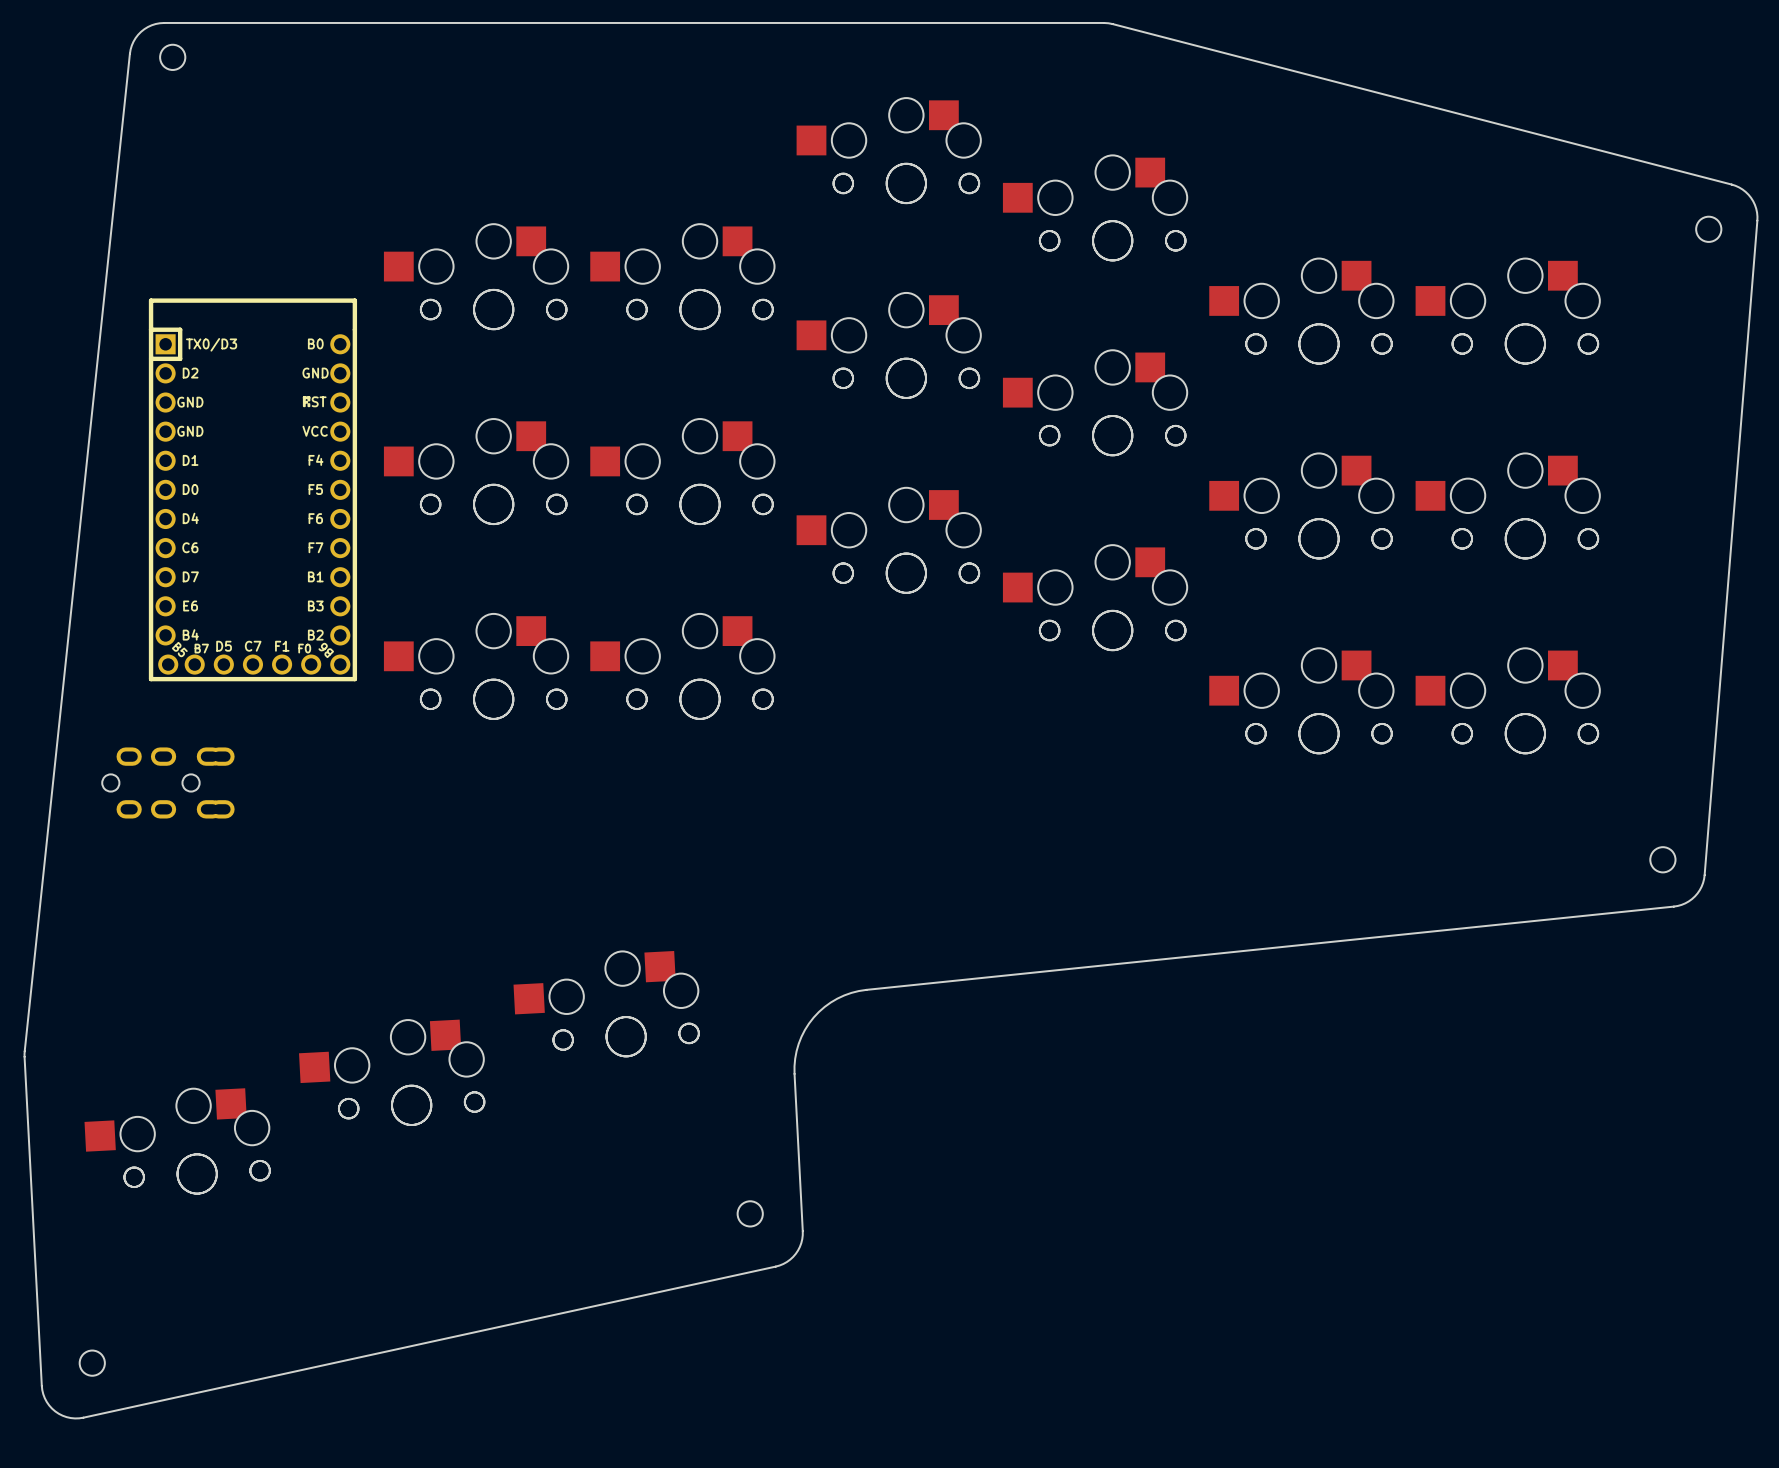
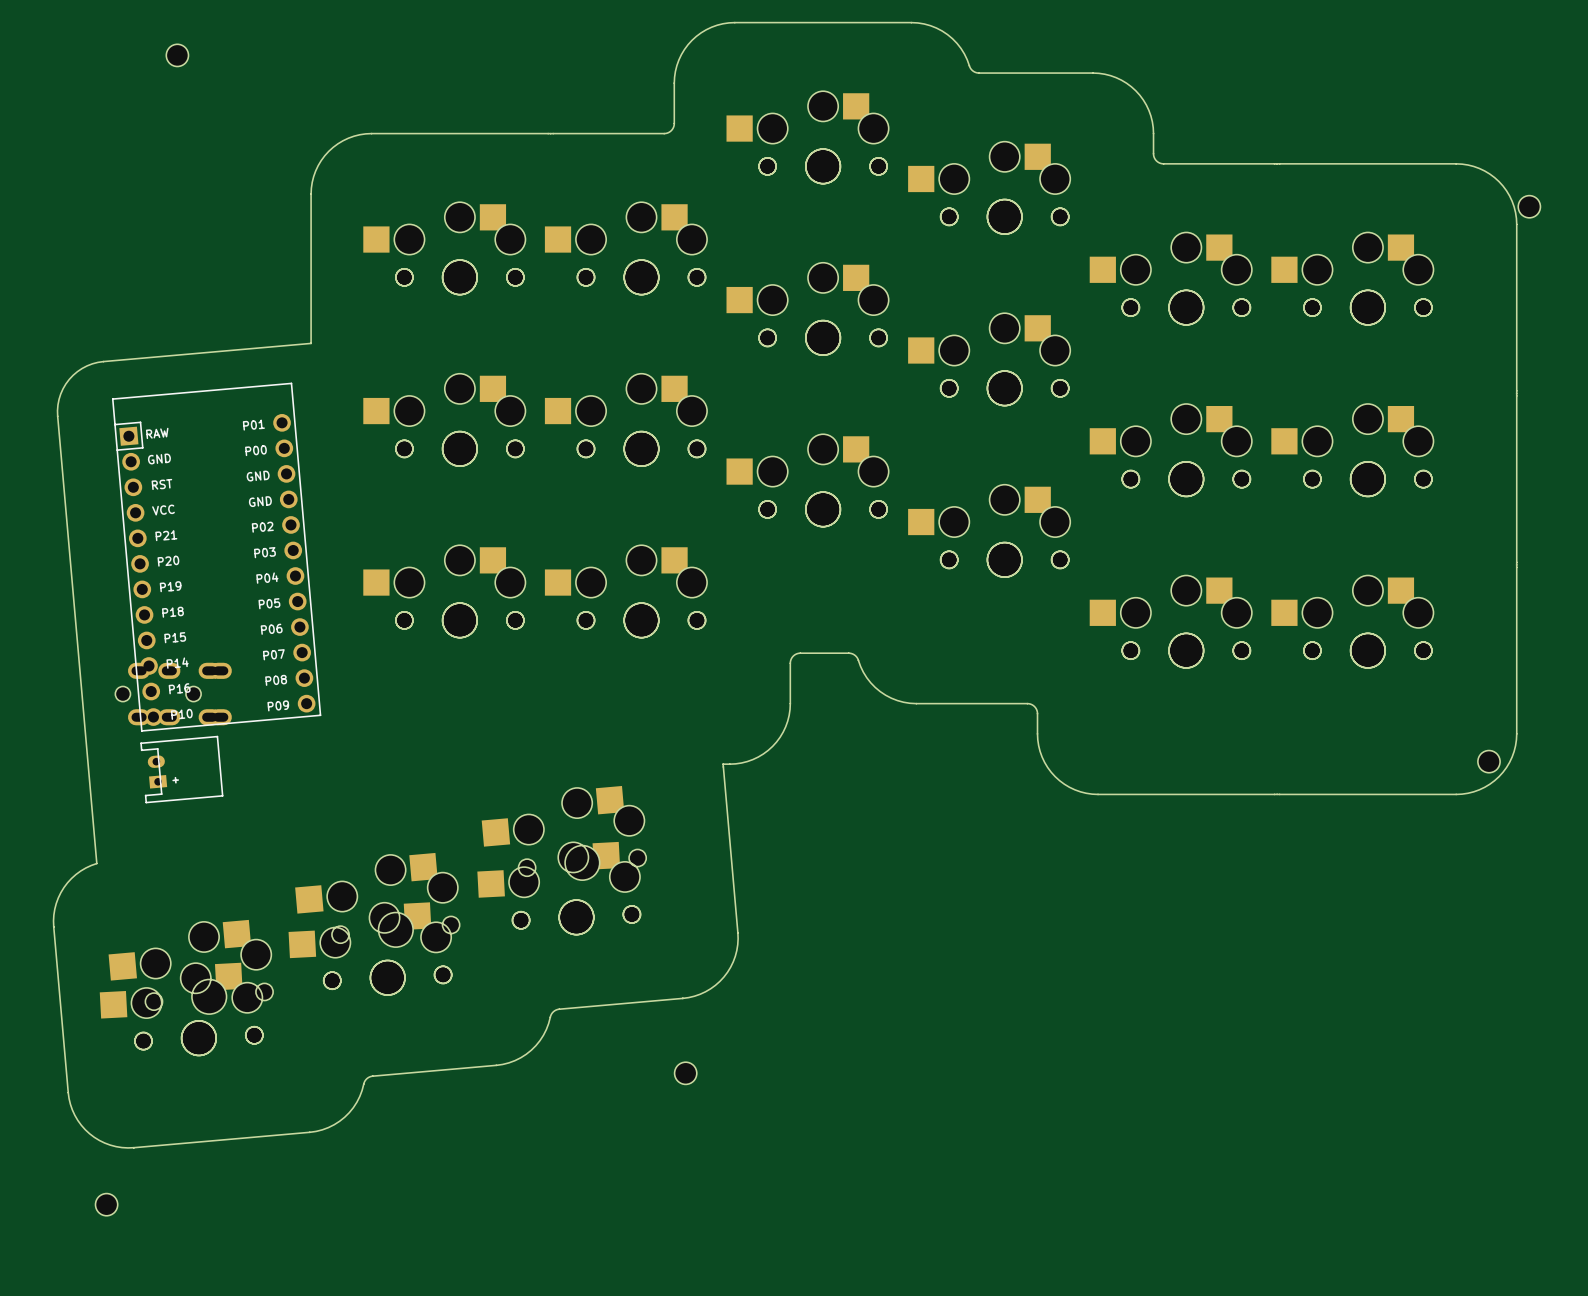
board edge: (164, 22) (1108, 23) (1739, 187) (1753, 201) (1757, 220) (1704, 875) (1699, 890) (1688, 901) (1673, 906) (851, 992) (830, 1002) (813, 1017) (804, 1029) (796, 1051) (794, 1073) (802, 1235) (795, 1253) (783, 1263) (83, 1417) (70, 1418) (58, 1413) (46, 1401) (41, 1385) (24, 1051) (129, 53) (133, 41) (141, 31) (151, 25) (164, 22) -> none
part: (252, 489) -> none
part: none -> (216, 557)
part: none -> (181, 769)
part: none -> (563, 833)
part: none -> (377, 900)
board edge: none -> (53, 926) (68, 1092) (72, 1109) (81, 1125) (99, 1140) (116, 1146) (133, 1147)
board edge: none -> (53, 926) (54, 909) (64, 887) (80, 871) (96, 863) (57, 416) (60, 393) (65, 383) (77, 371) (97, 362) (311, 343) (312, 182) (321, 160) (333, 147) (343, 140) (359, 134) (371, 133) (666, 133) (672, 129) (674, 124) (674, 77) (678, 59) (692, 40) (711, 27) (734, 22) (911, 22) (930, 25) (947, 34) (961, 48) (970, 68) (976, 72) (1098, 73) (1121, 80) (1135, 90) (1146, 105) (1153, 127) (1153, 156) (1161, 163) (1462, 164) (1484, 171) (1499, 181) (1512, 201) (1516, 224) (1516, 733) (1512, 757) (1499, 776) (1479, 789) (1456, 794) (1086, 793) (1064, 784) (1047, 767) (1038, 745) (1037, 711) (1031, 704) (903, 702) (885, 695) (875, 687) (863, 672) (857, 658) (852, 653) (797, 653) (790, 660) (790, 709) (785, 726) (780, 737) (768, 750) (752, 759) (741, 763) (723, 764) (737, 932)
board edge: none -> (737, 932) (735, 956) (723, 977) (705, 991) (682, 998)
part: none -> (190, 966)
board edge: none -> (682, 998) (556, 1009) (551, 1013) (546, 1029) (535, 1045) (520, 1057) (502, 1064) (370, 1076) (365, 1080) (359, 1096) (349, 1112) (339, 1121) (322, 1129) (133, 1147)

